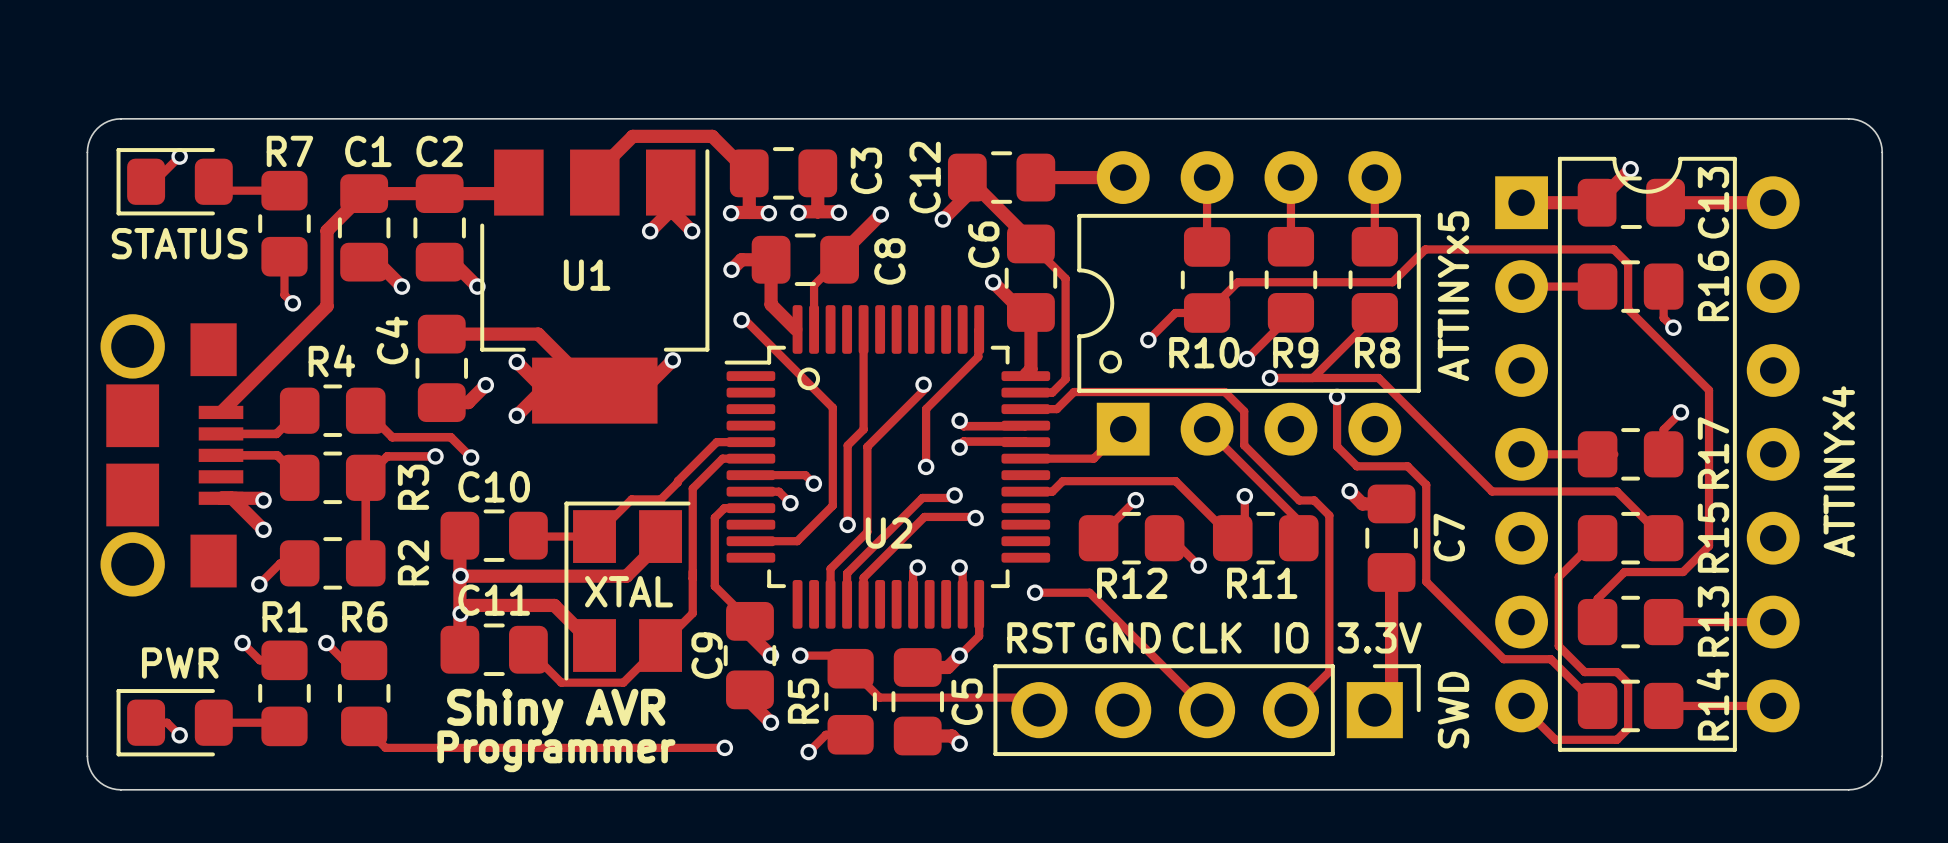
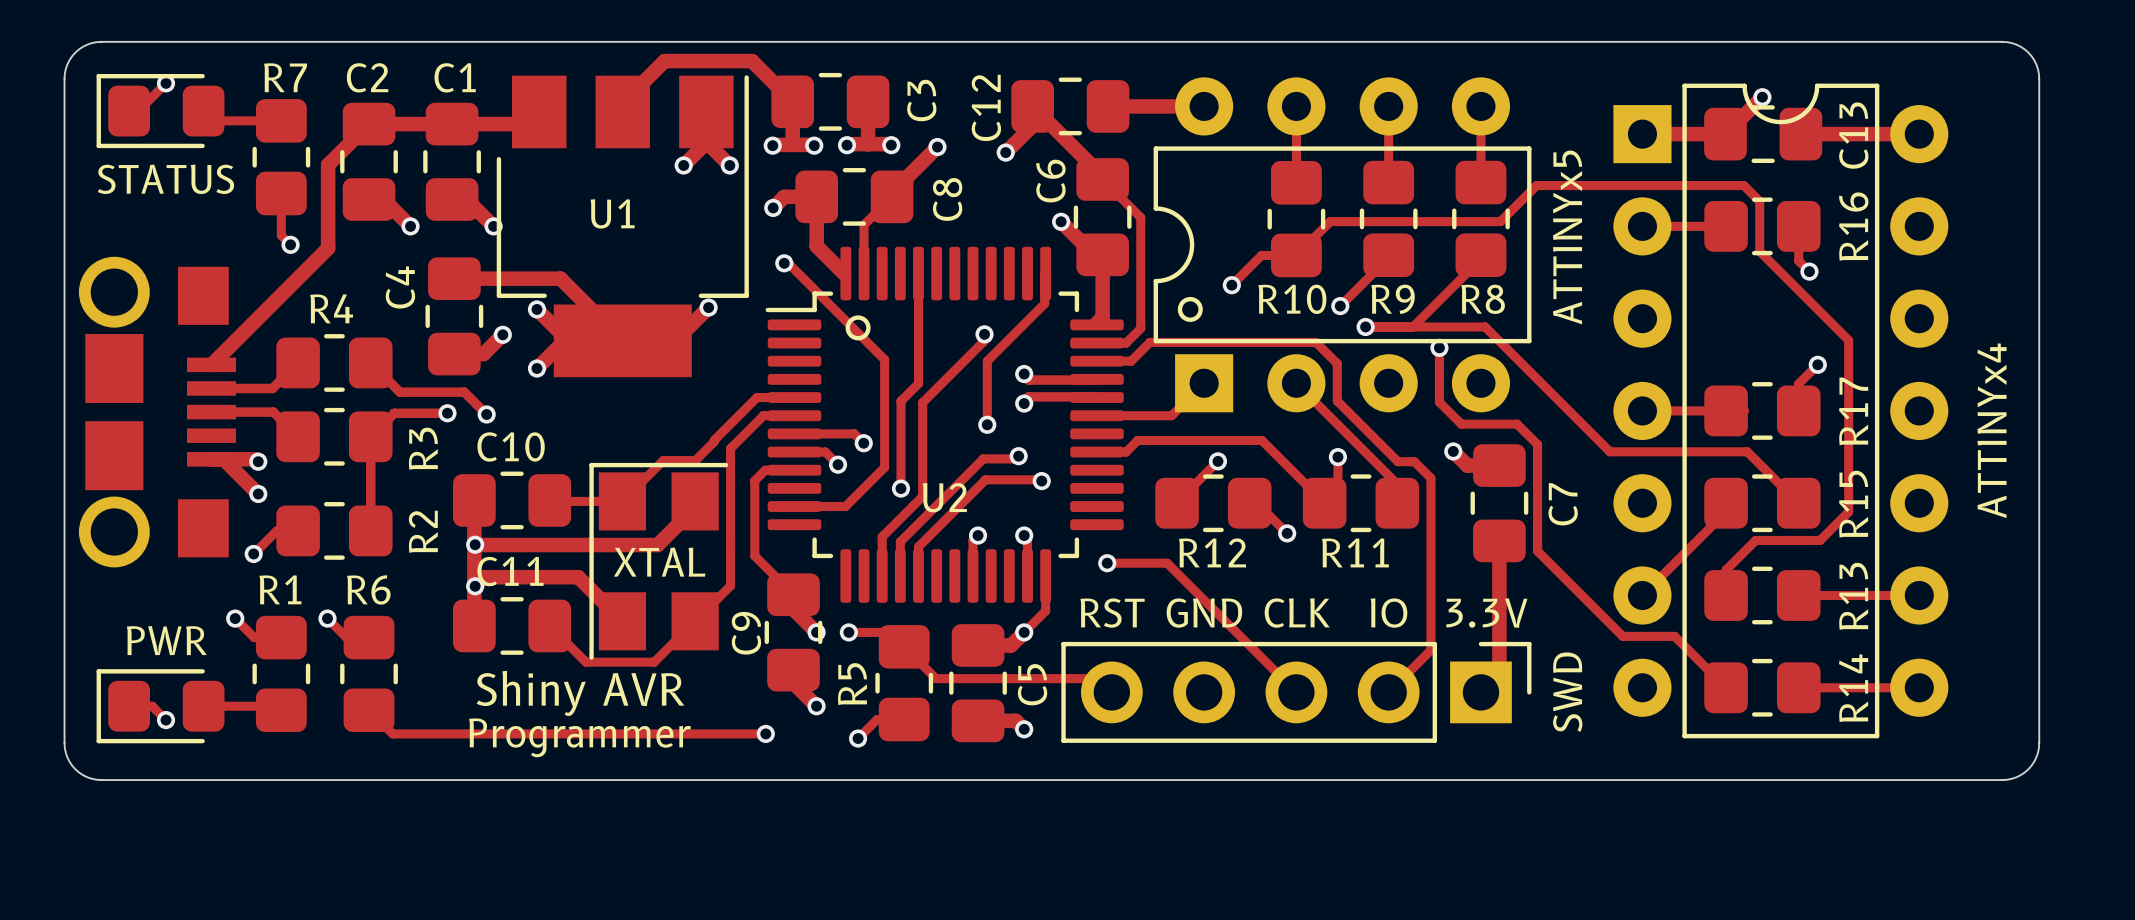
C1 name: C1 (368, 151) -> C2 (367, 77)
C2 name: C2 (439, 151) -> C1 (455, 77)
track: (1597, 538) (1558, 577) (1558, 646) (1584, 672) (1617, 672) (1628, 683) (1628, 728) (1617, 739) (1555, 739) (1521, 705) -> (1726, 503) (1726, 511) (1642, 595)

